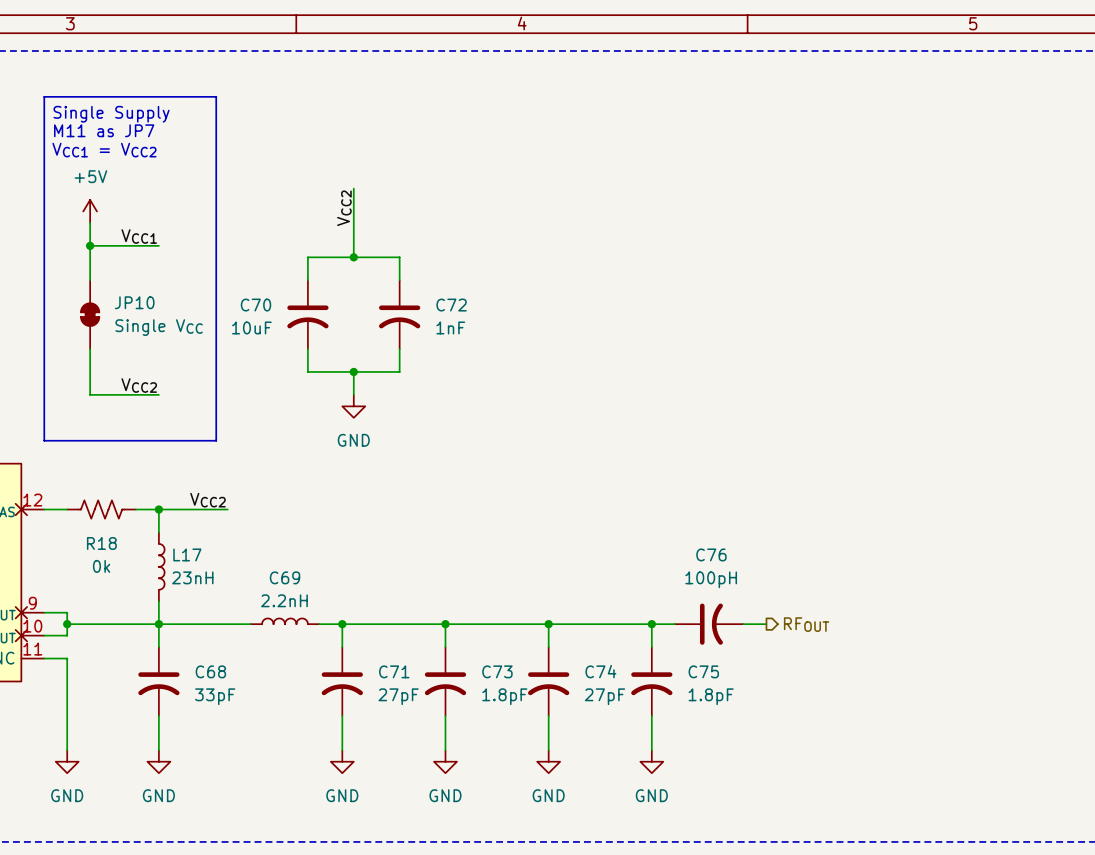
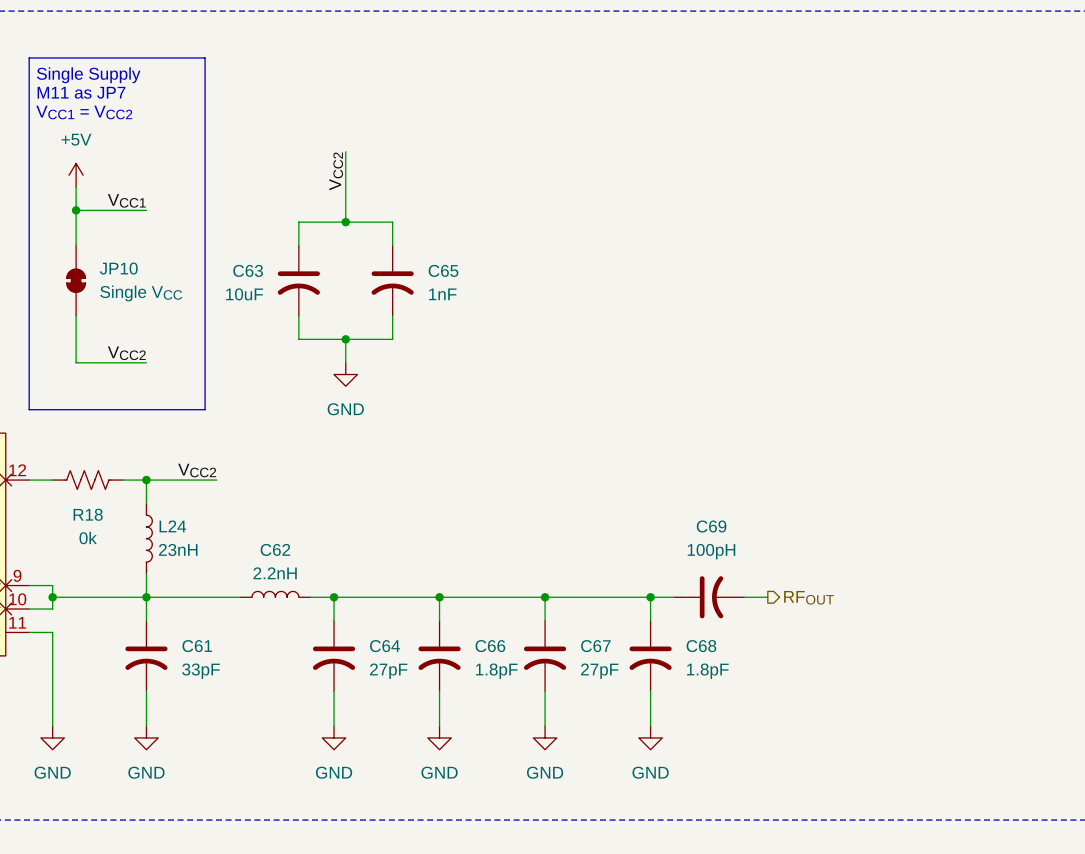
C70 name: C70 (255, 305) -> C63 (248, 270)
C72 name: C72 (451, 305) -> C65 (443, 270)
L17 name: L17 (187, 554) -> L24 (172, 526)
C76 name: C76 (711, 554) -> C69 (711, 526)
C69 name: C69 (285, 577) -> C62 (275, 549)
C68 name: C68 (210, 671) -> C61 (197, 646)
C71 name: C71 (394, 671) -> C64 (385, 646)
C73 name: C73 (497, 671) -> C66 (490, 646)
C74 name: C74 (600, 671) -> C67 (595, 646)
C75 name: C75 (703, 671) -> C68 (701, 646)

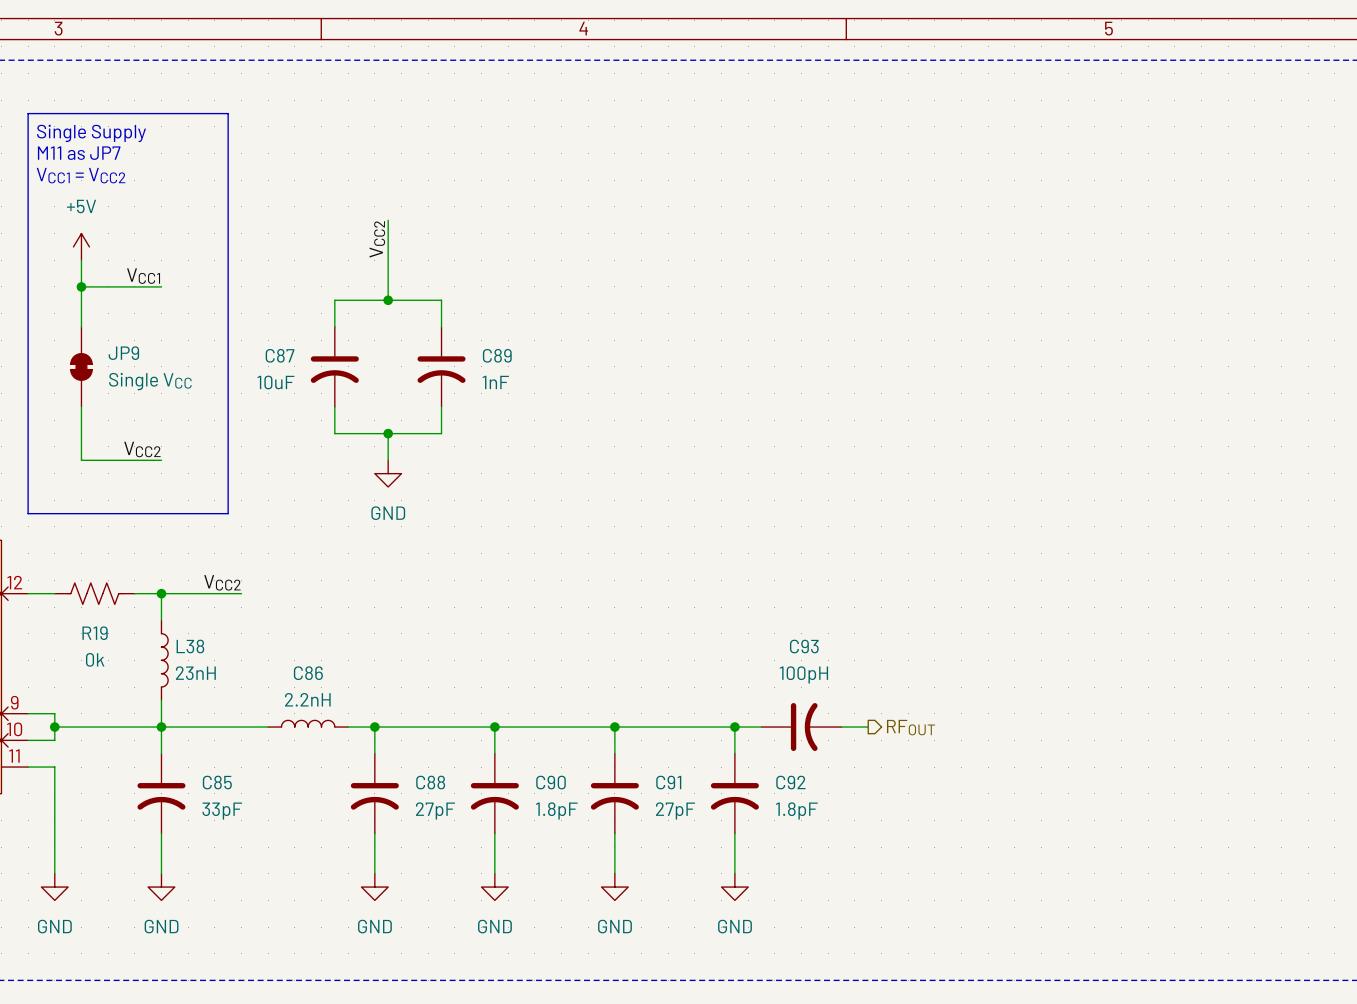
JP10 name: JP10 (118, 268) -> JP9 (123, 353)
C63 name: C63 (248, 270) -> C87 (280, 355)
C65 name: C65 (443, 270) -> C89 (497, 355)
R18 name: R18 (88, 514) -> R19 (95, 633)
L24 name: L24 (172, 526) -> L38 (190, 646)
C69 name: C69 (711, 526) -> C93 (804, 646)
C62 name: C62 (275, 549) -> C86 (308, 673)
C61 name: C61 (197, 646) -> C85 (217, 782)
C64 name: C64 (385, 646) -> C88 (430, 782)
C66 name: C66 (490, 646) -> C90 (551, 782)
C67 name: C67 (595, 646) -> C91 (668, 782)
C68 name: C68 (701, 646) -> C92 (790, 782)

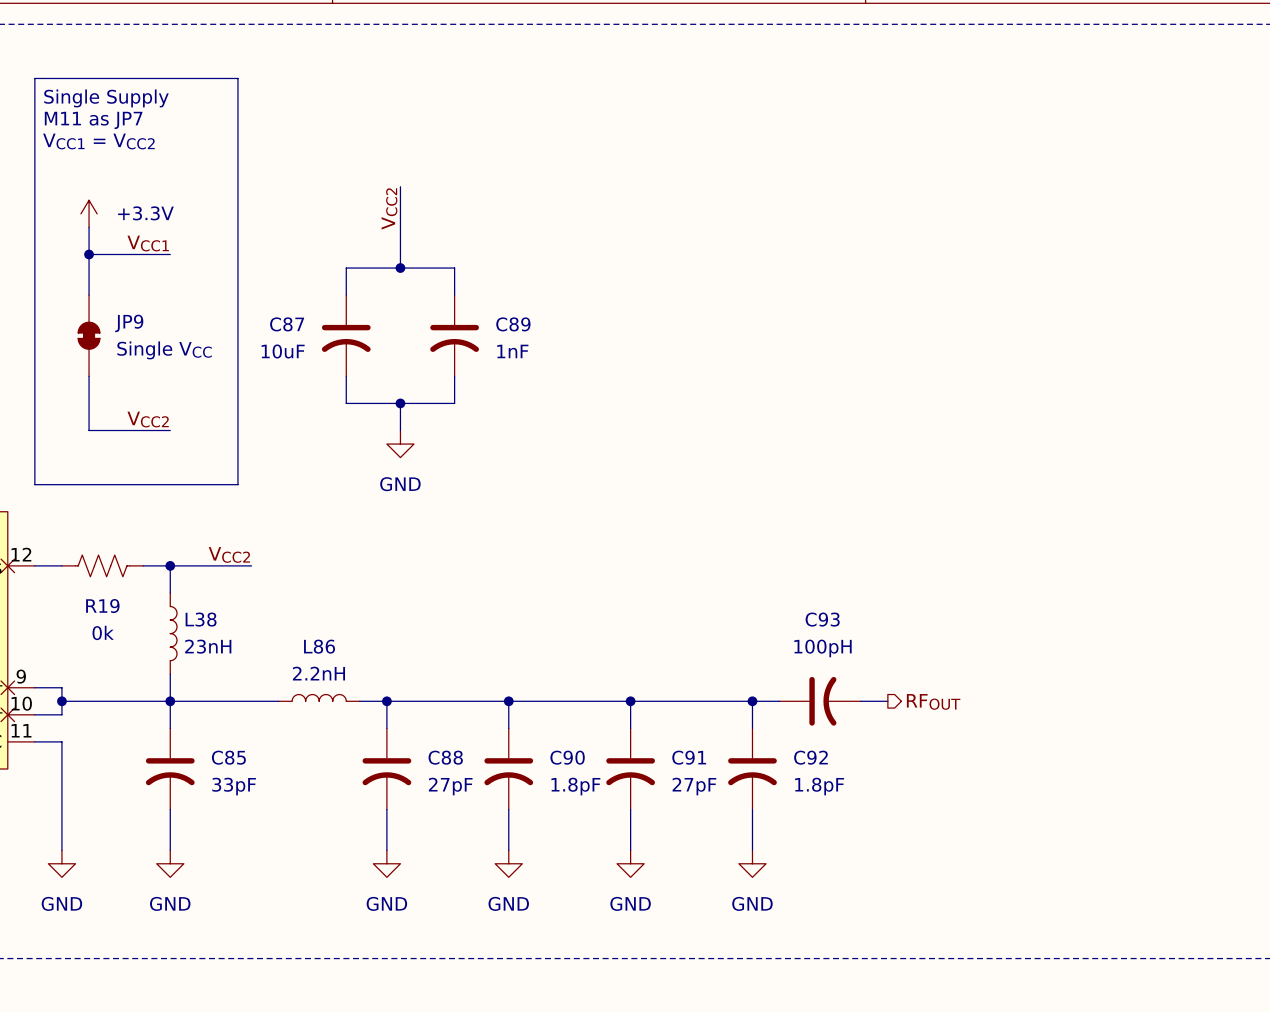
power symbol: +5V (81, 246) -> +3.3V (89, 213)
C86 name: C86 (308, 673) -> L86 (319, 646)

